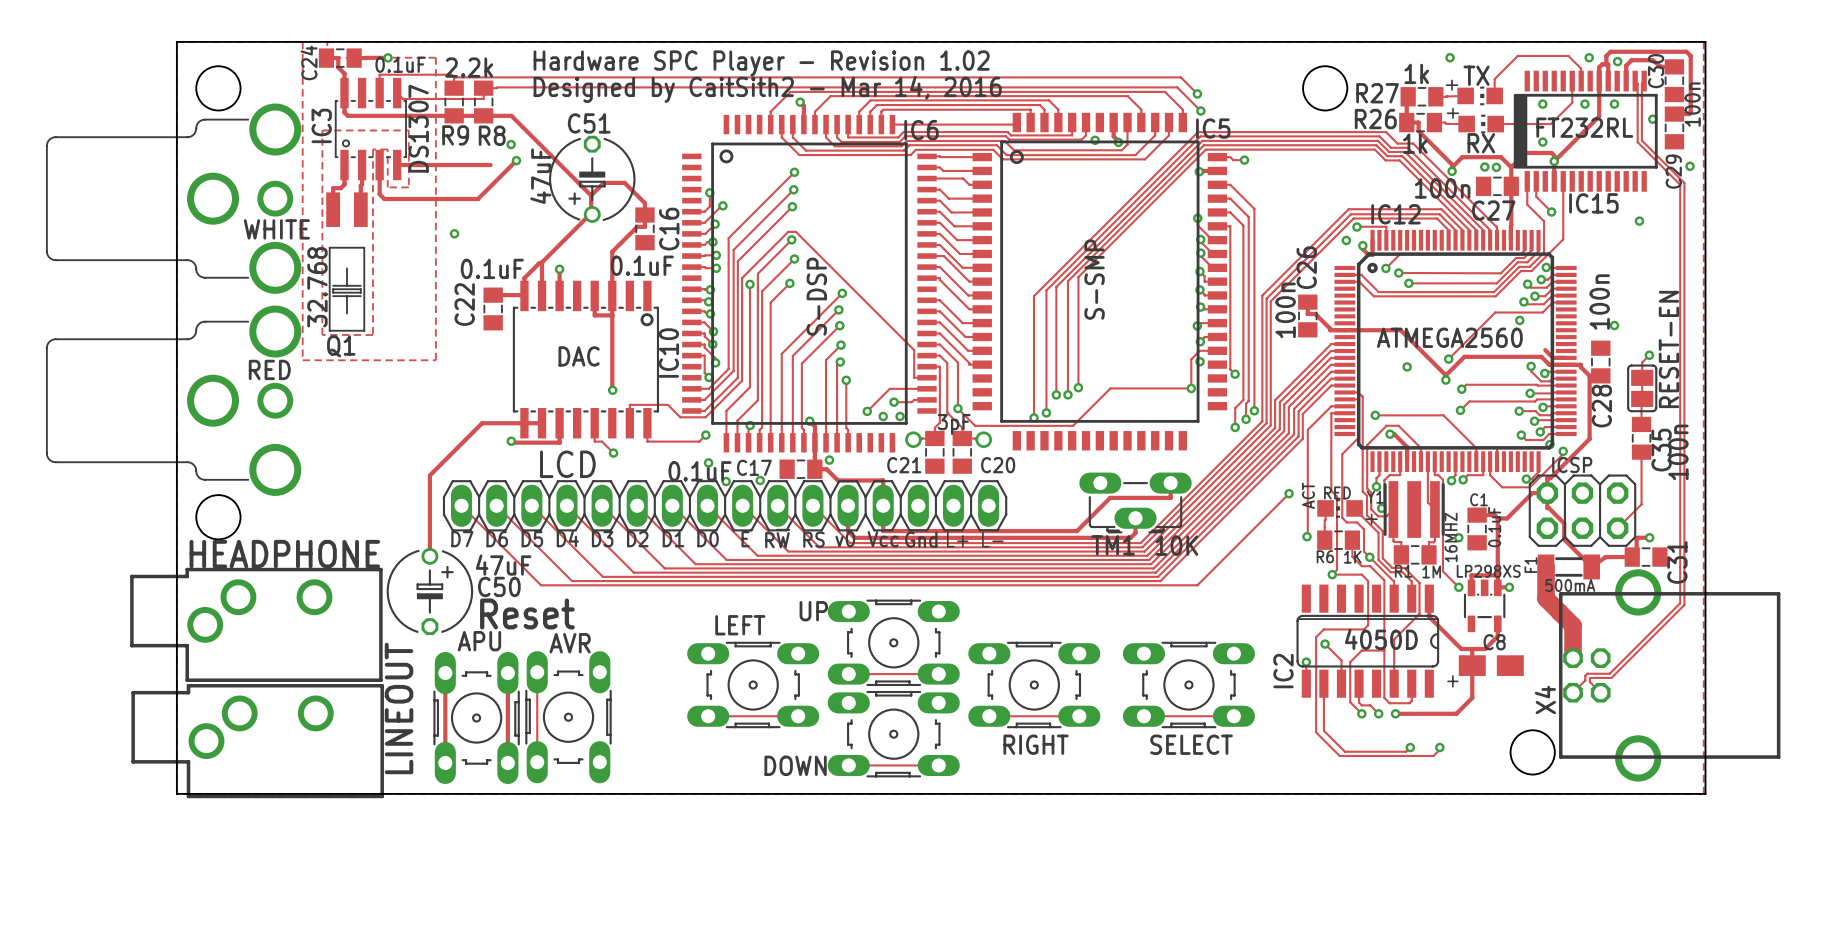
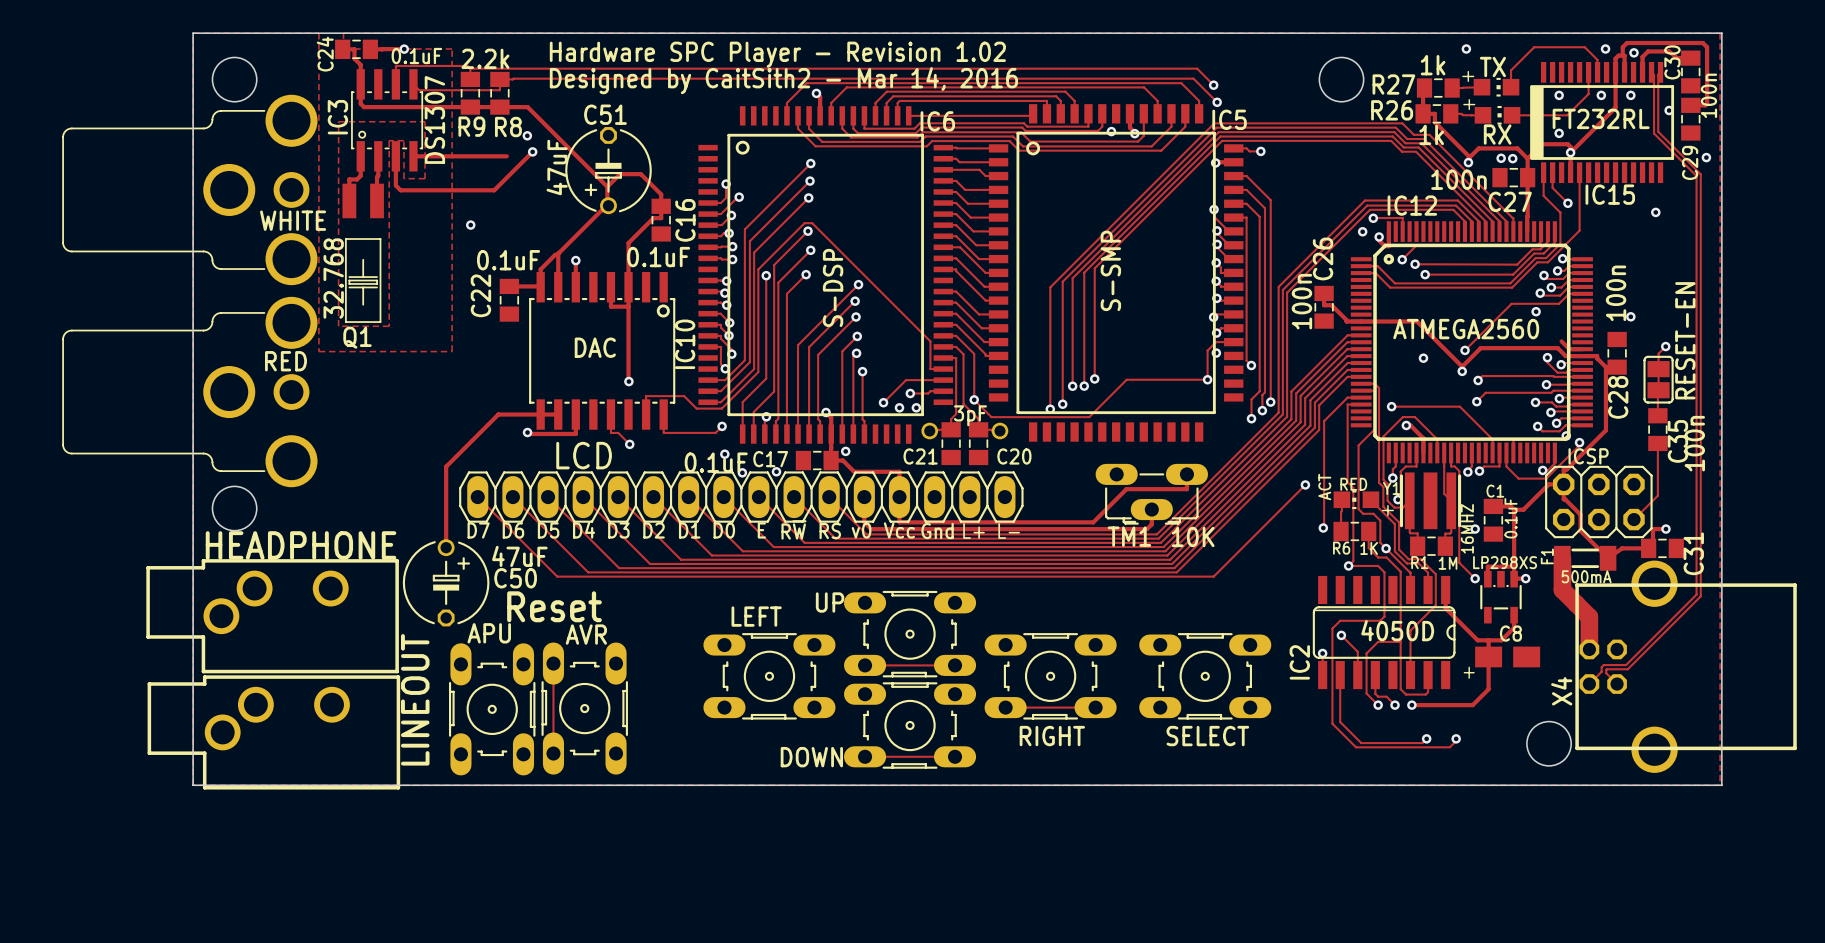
track: (445, 673) (445, 762) -> none
track: (507, 673) (507, 762) -> none
track: (708, 716) (798, 716) -> none
track: (1143, 716) (1233, 716) -> none
APU rotation: 0° (476, 718) -> 180° (492, 709)

